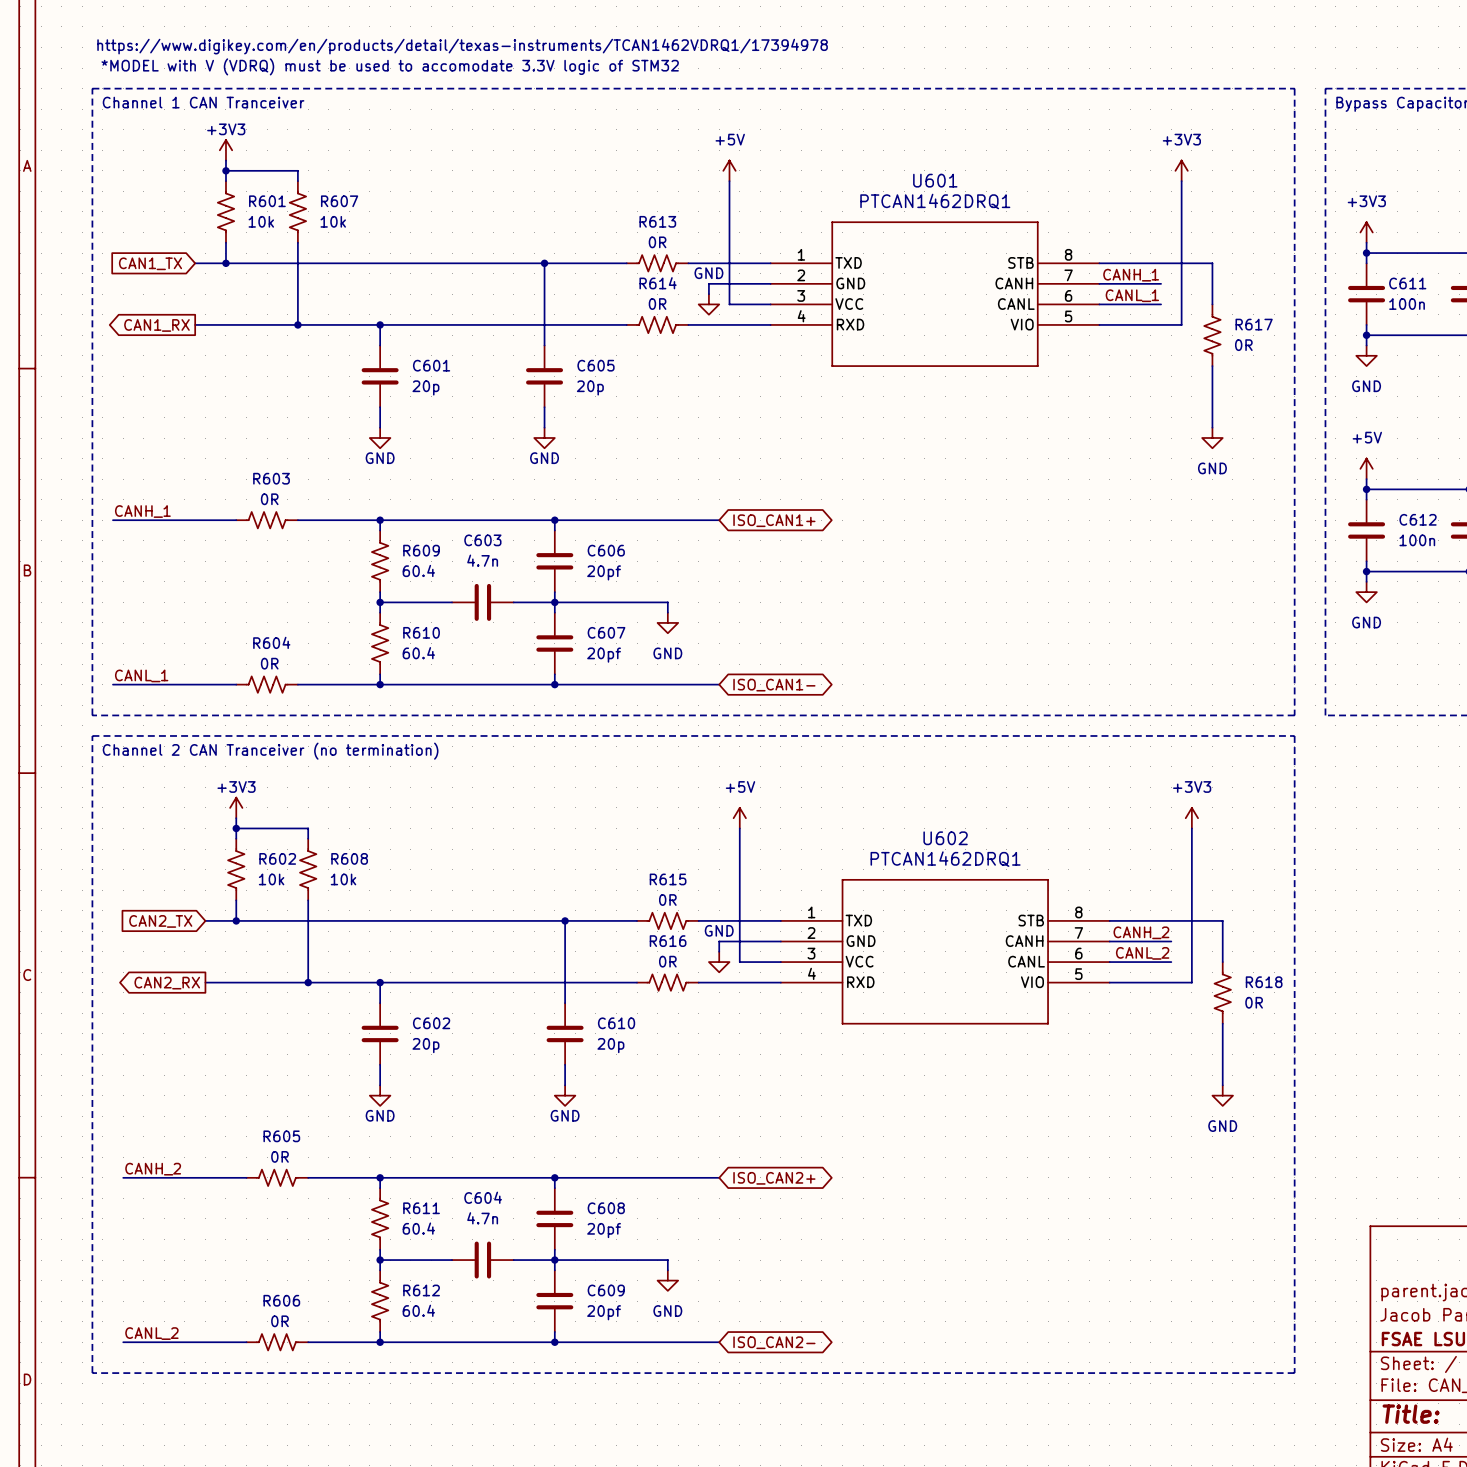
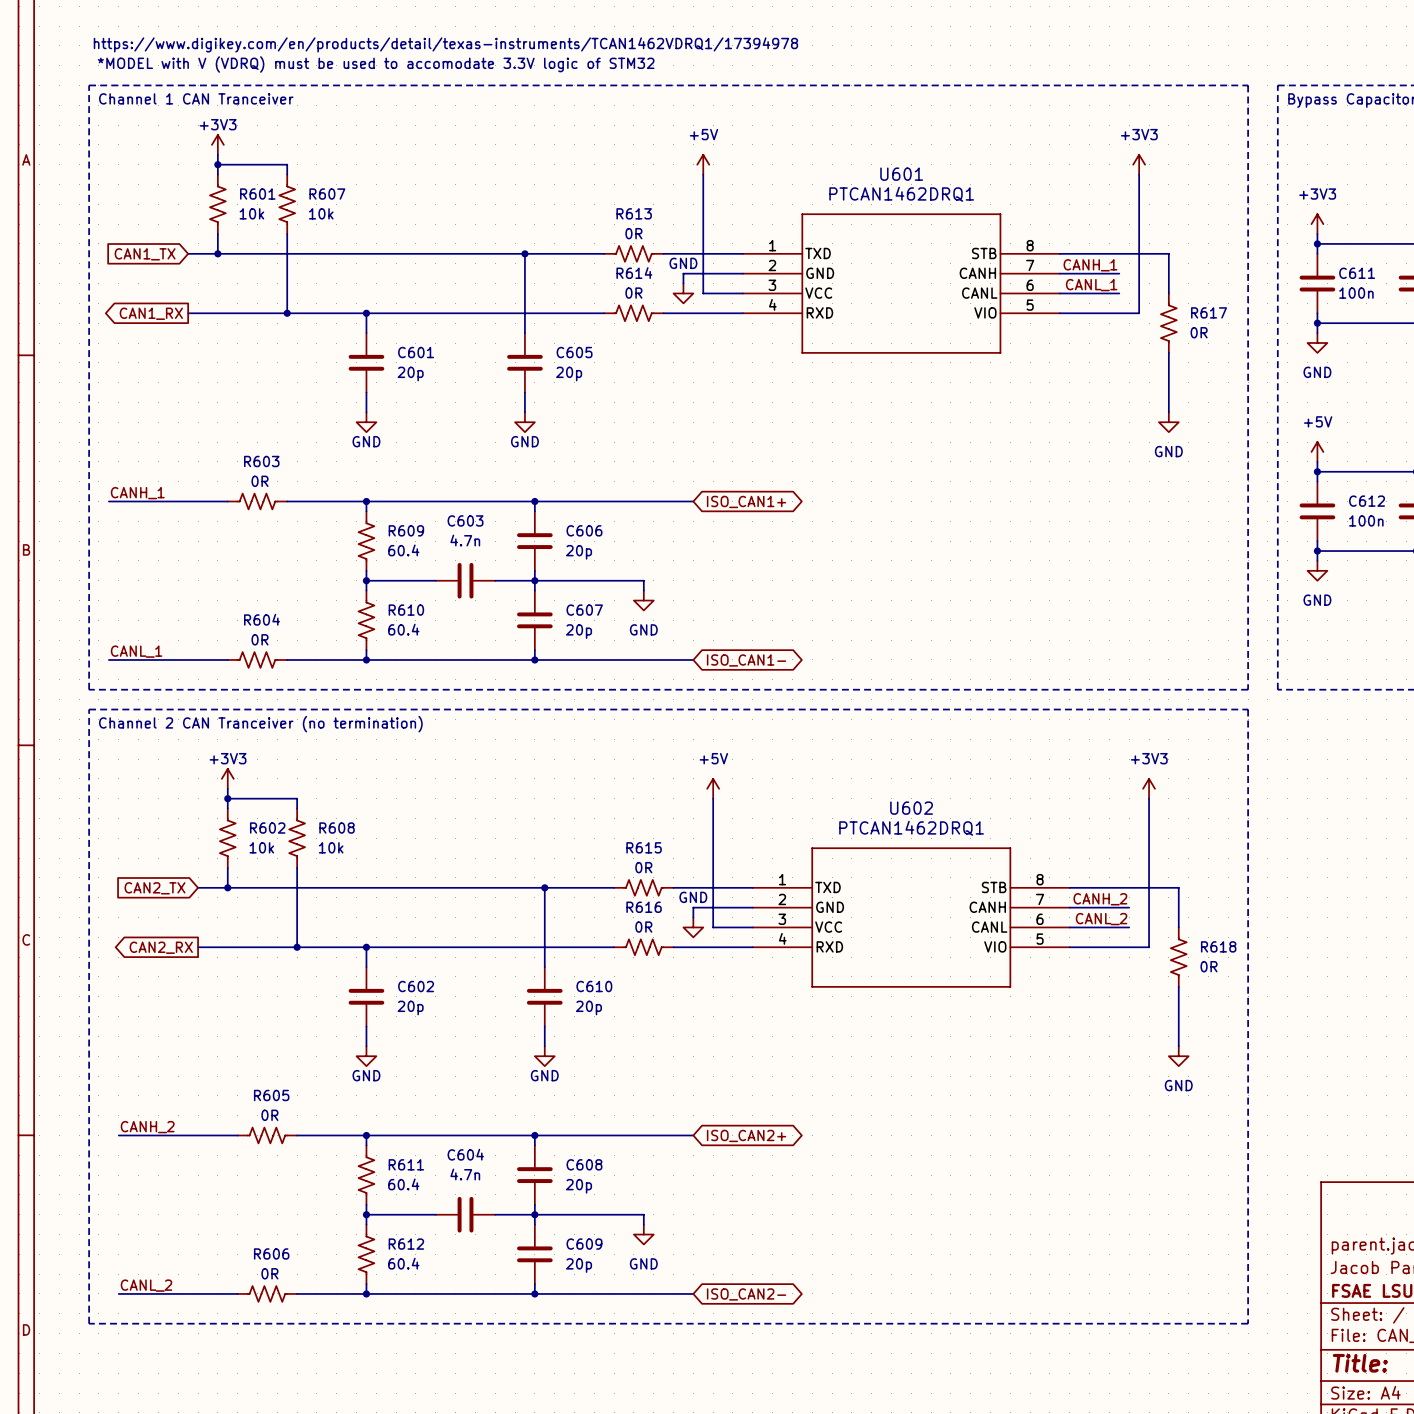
C606 value: 20pf (604, 572) -> 20p (579, 552)
C607 value: 20pf (604, 655) -> 20p (579, 631)
C608 value: 20pf (604, 1230) -> 20p (579, 1186)
C609 value: 20pf (604, 1312) -> 20p (579, 1265)

